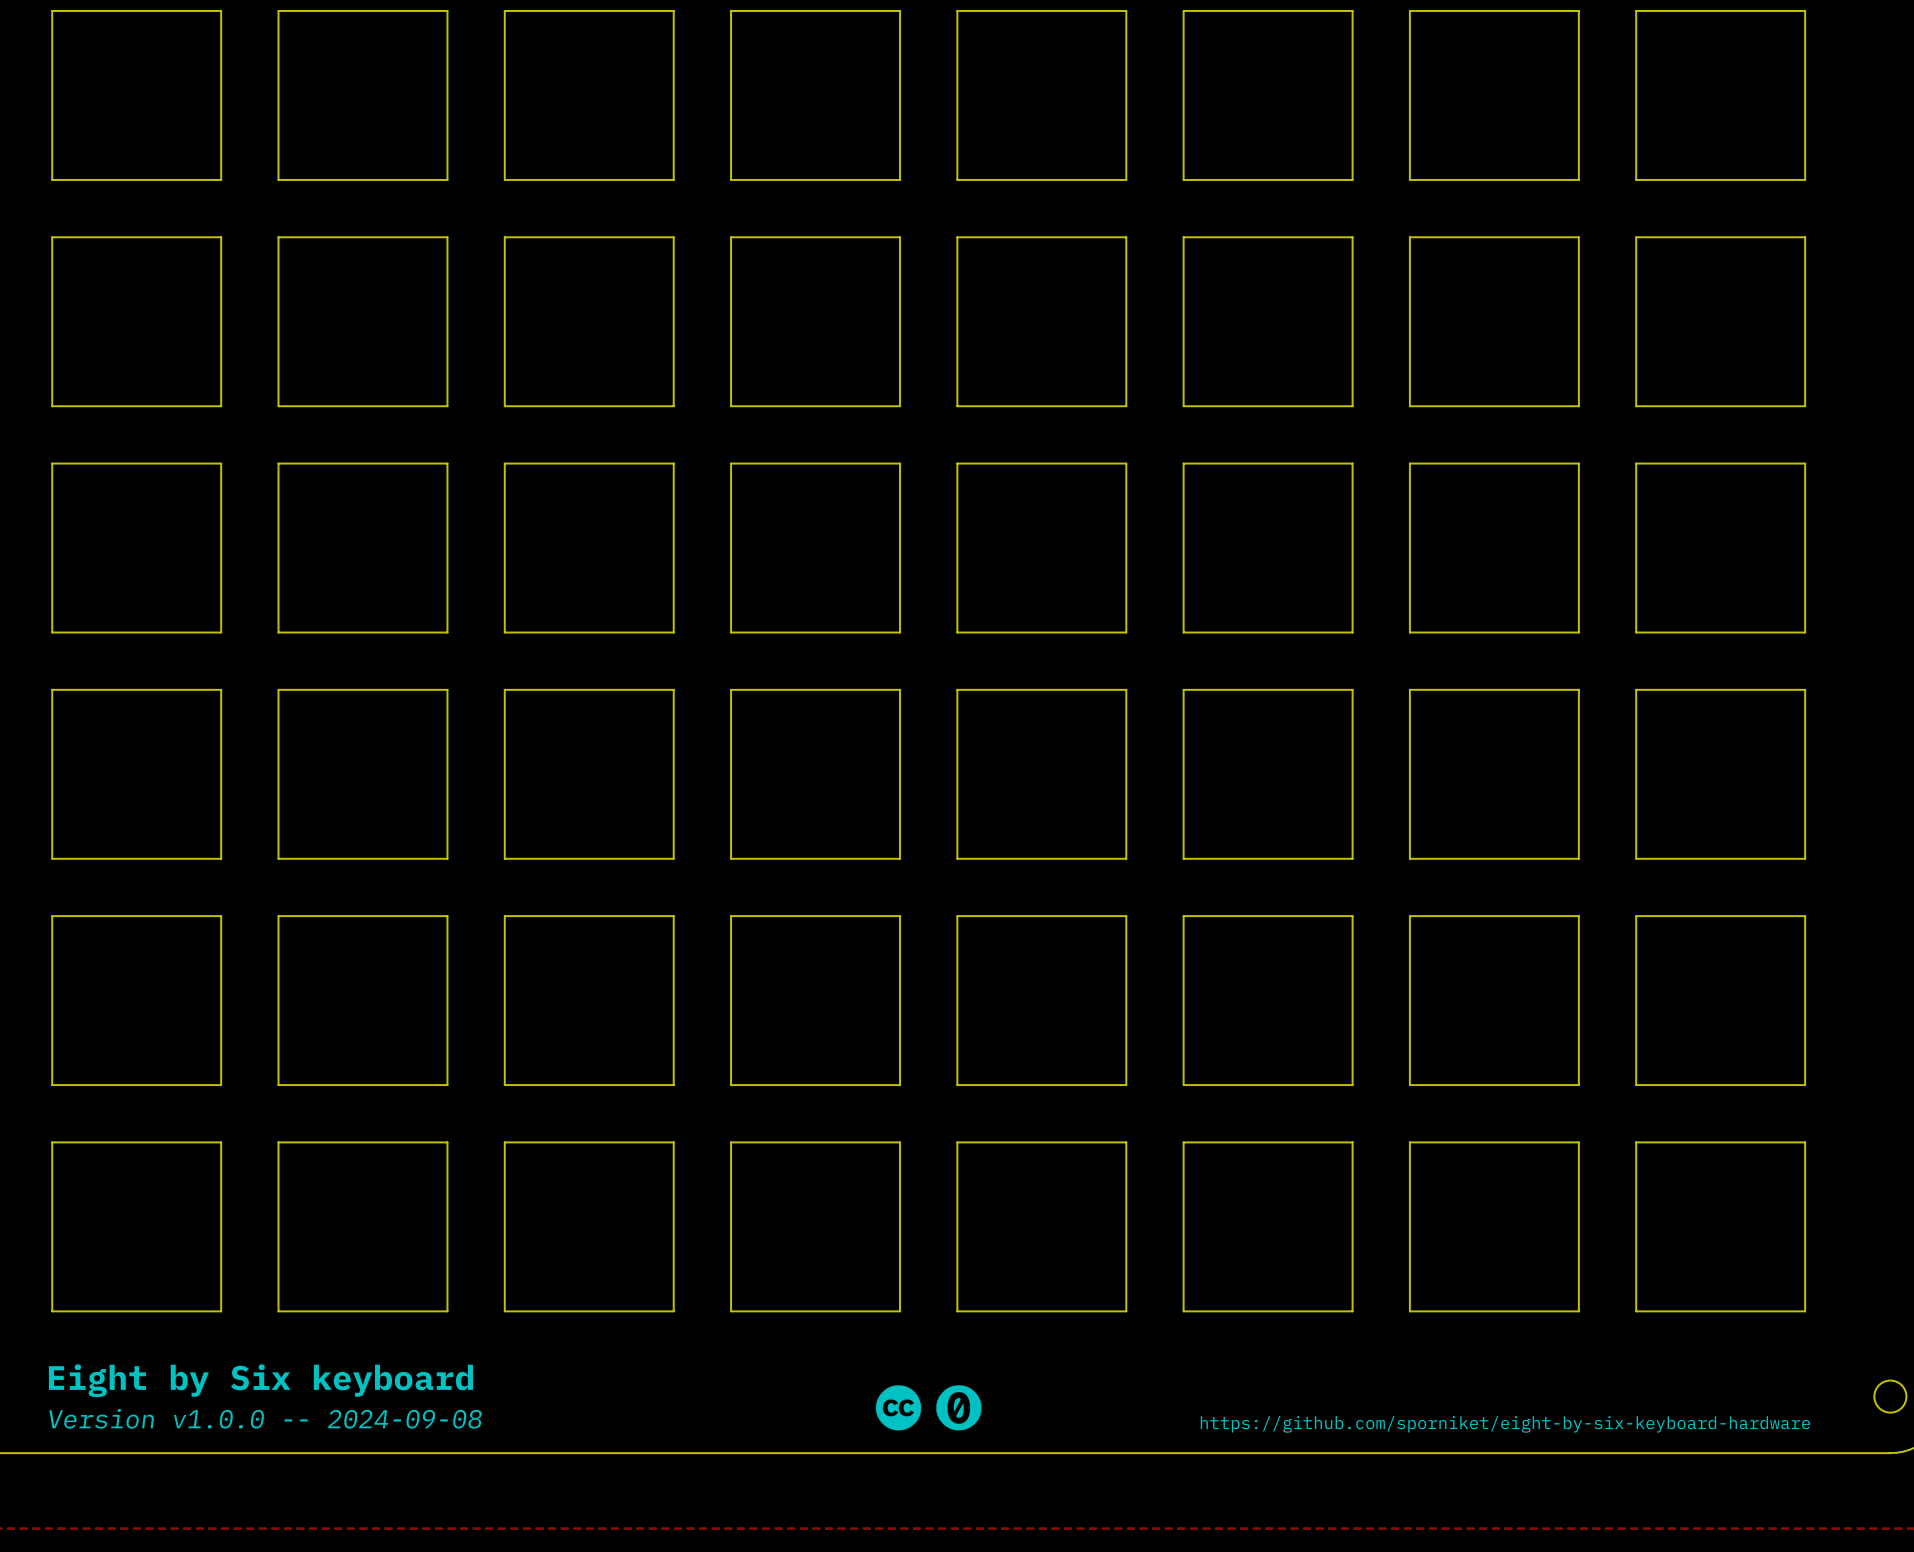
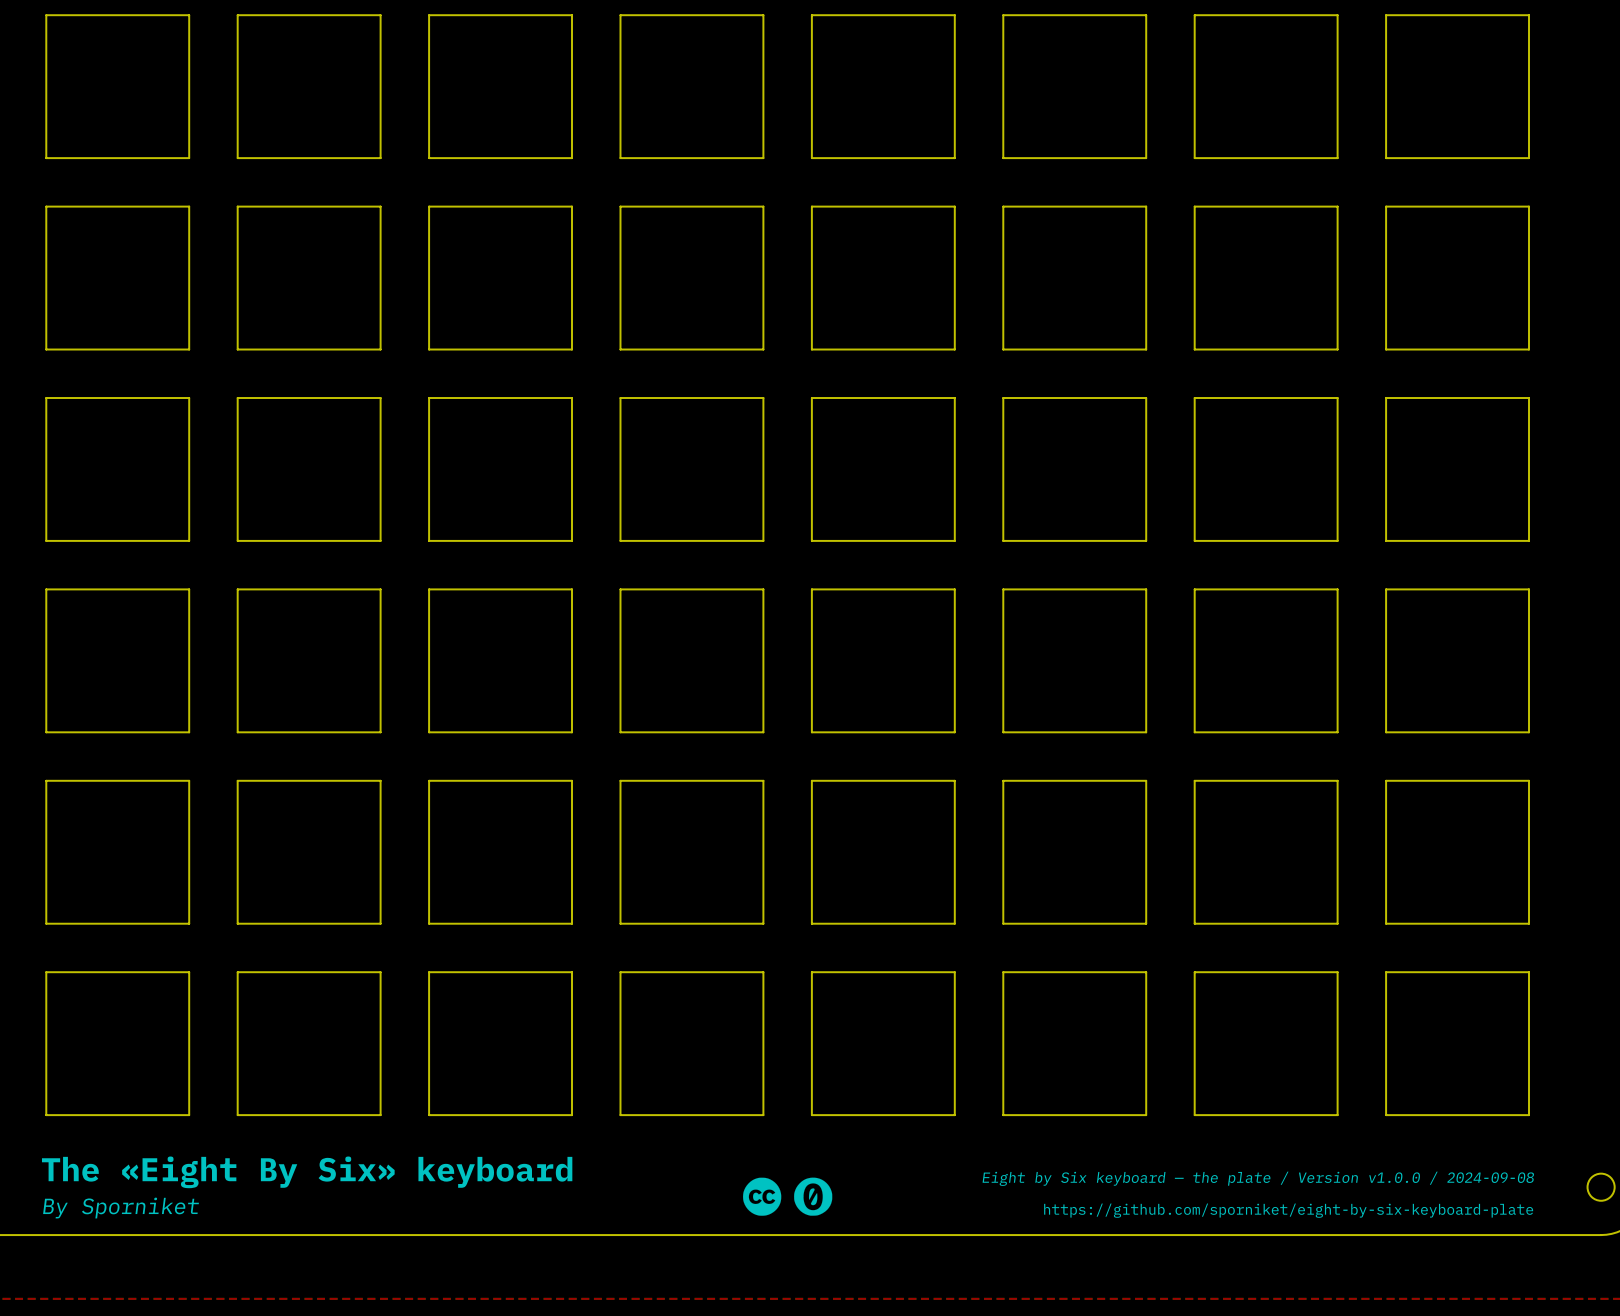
text: Eight by Six keyboard (260, 1380) -> The «Eight By Six» keyboard (307, 1172)
text: none -> Eight by Six keyboard — the plate / Version v1.0.0 / 2024-09-08 (1258, 1178)
text: Version v1.0.0 -- 2024-09-08 (265, 1418) -> By Sporniket (121, 1208)
text: https://github.com/sporniket/eight-by-six-keyboard-hardware (1505, 1424) -> https://github.com/sporniket/eight-by-six-keyboard-plate (1288, 1210)

